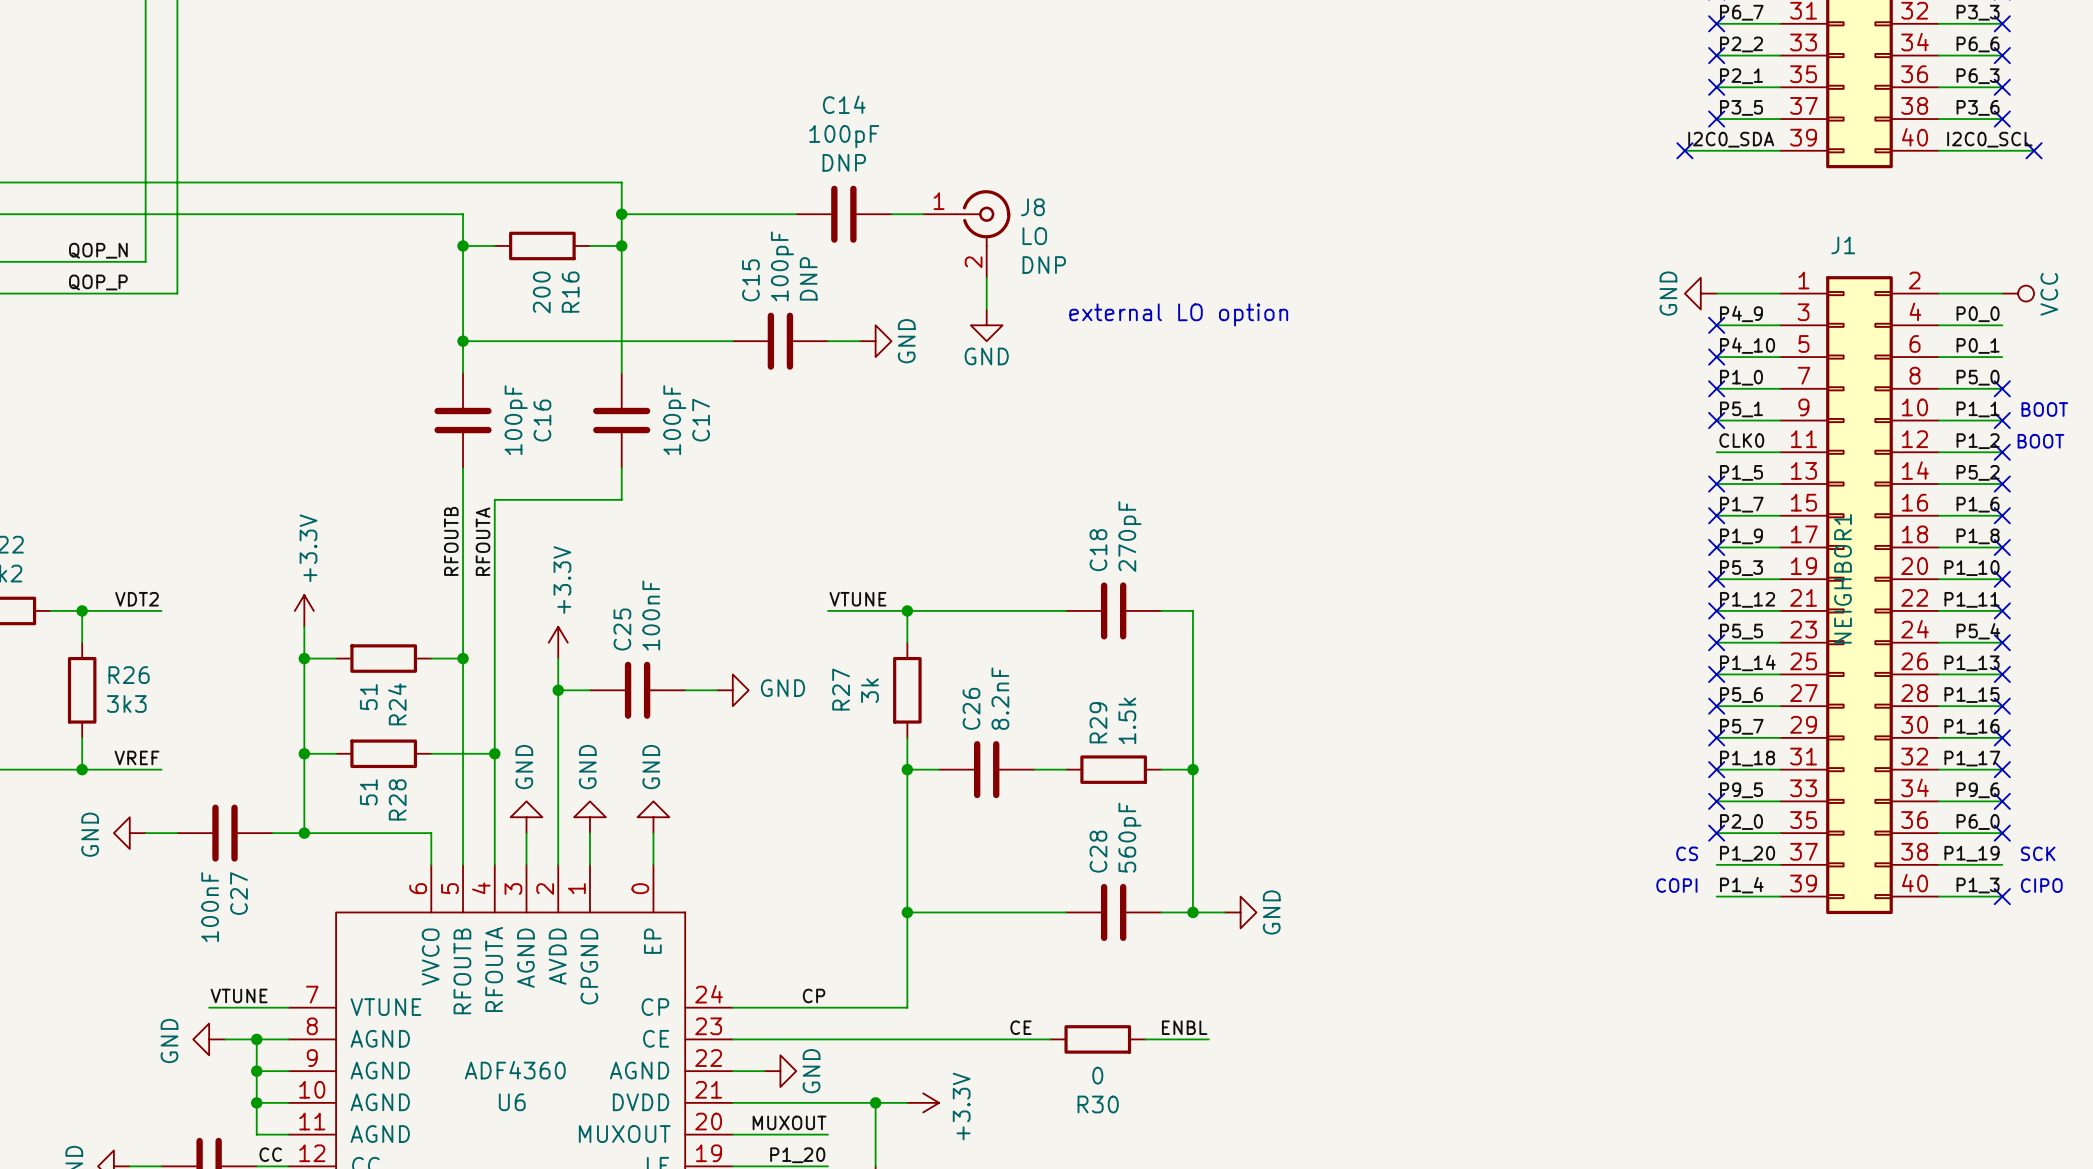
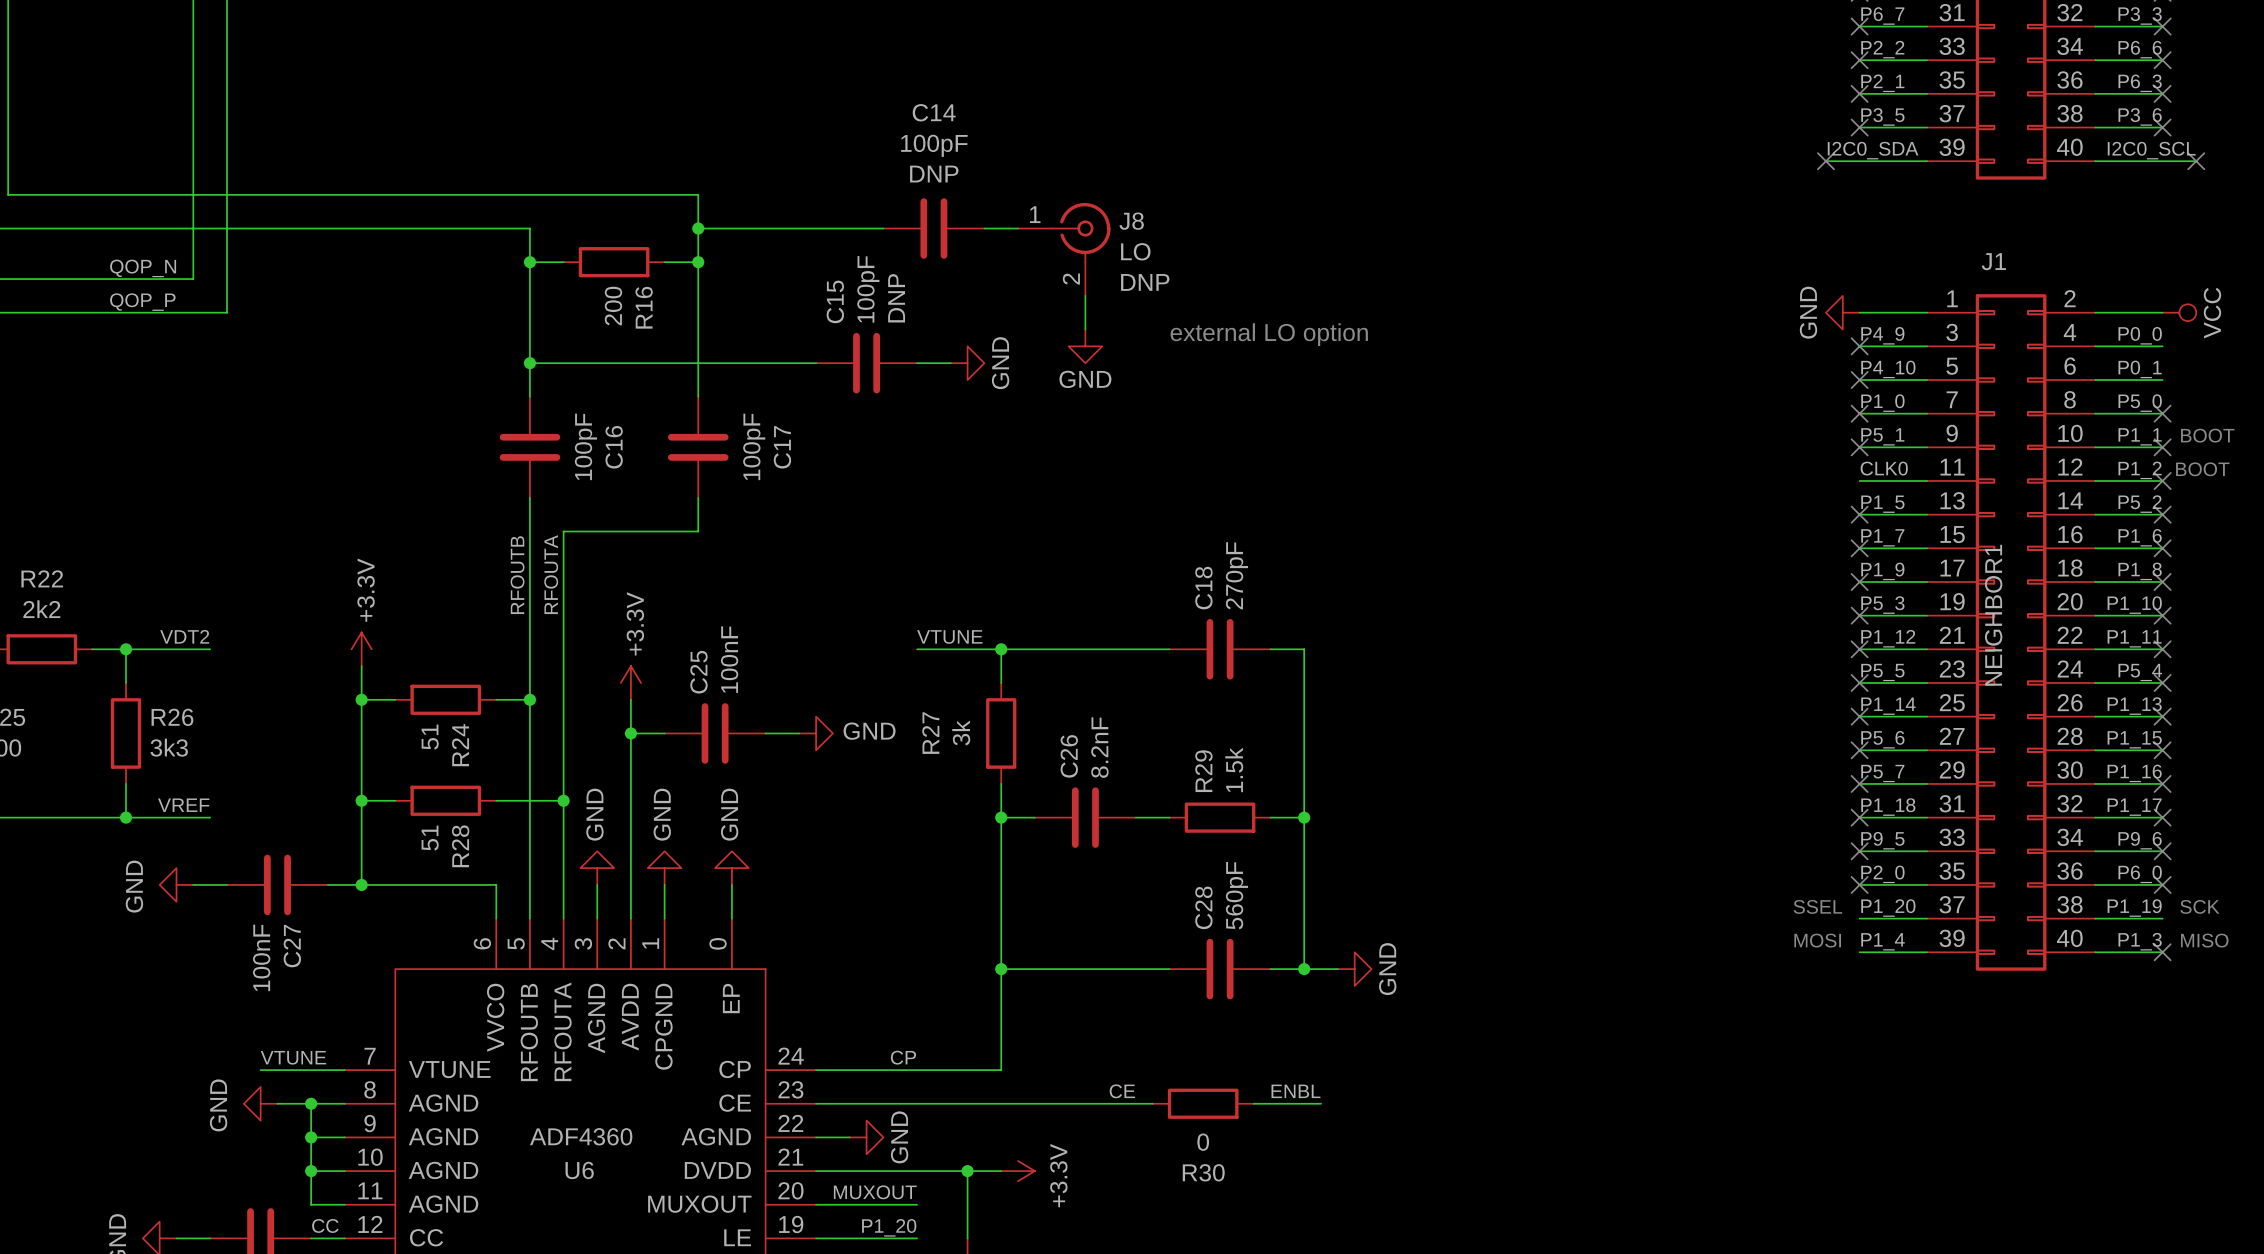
text: CS (1687, 853) -> SSEL (1817, 906)
text: COPI (1676, 885) -> MOSI (1817, 940)
text: CIPO (2041, 885) -> MISO (2204, 940)

